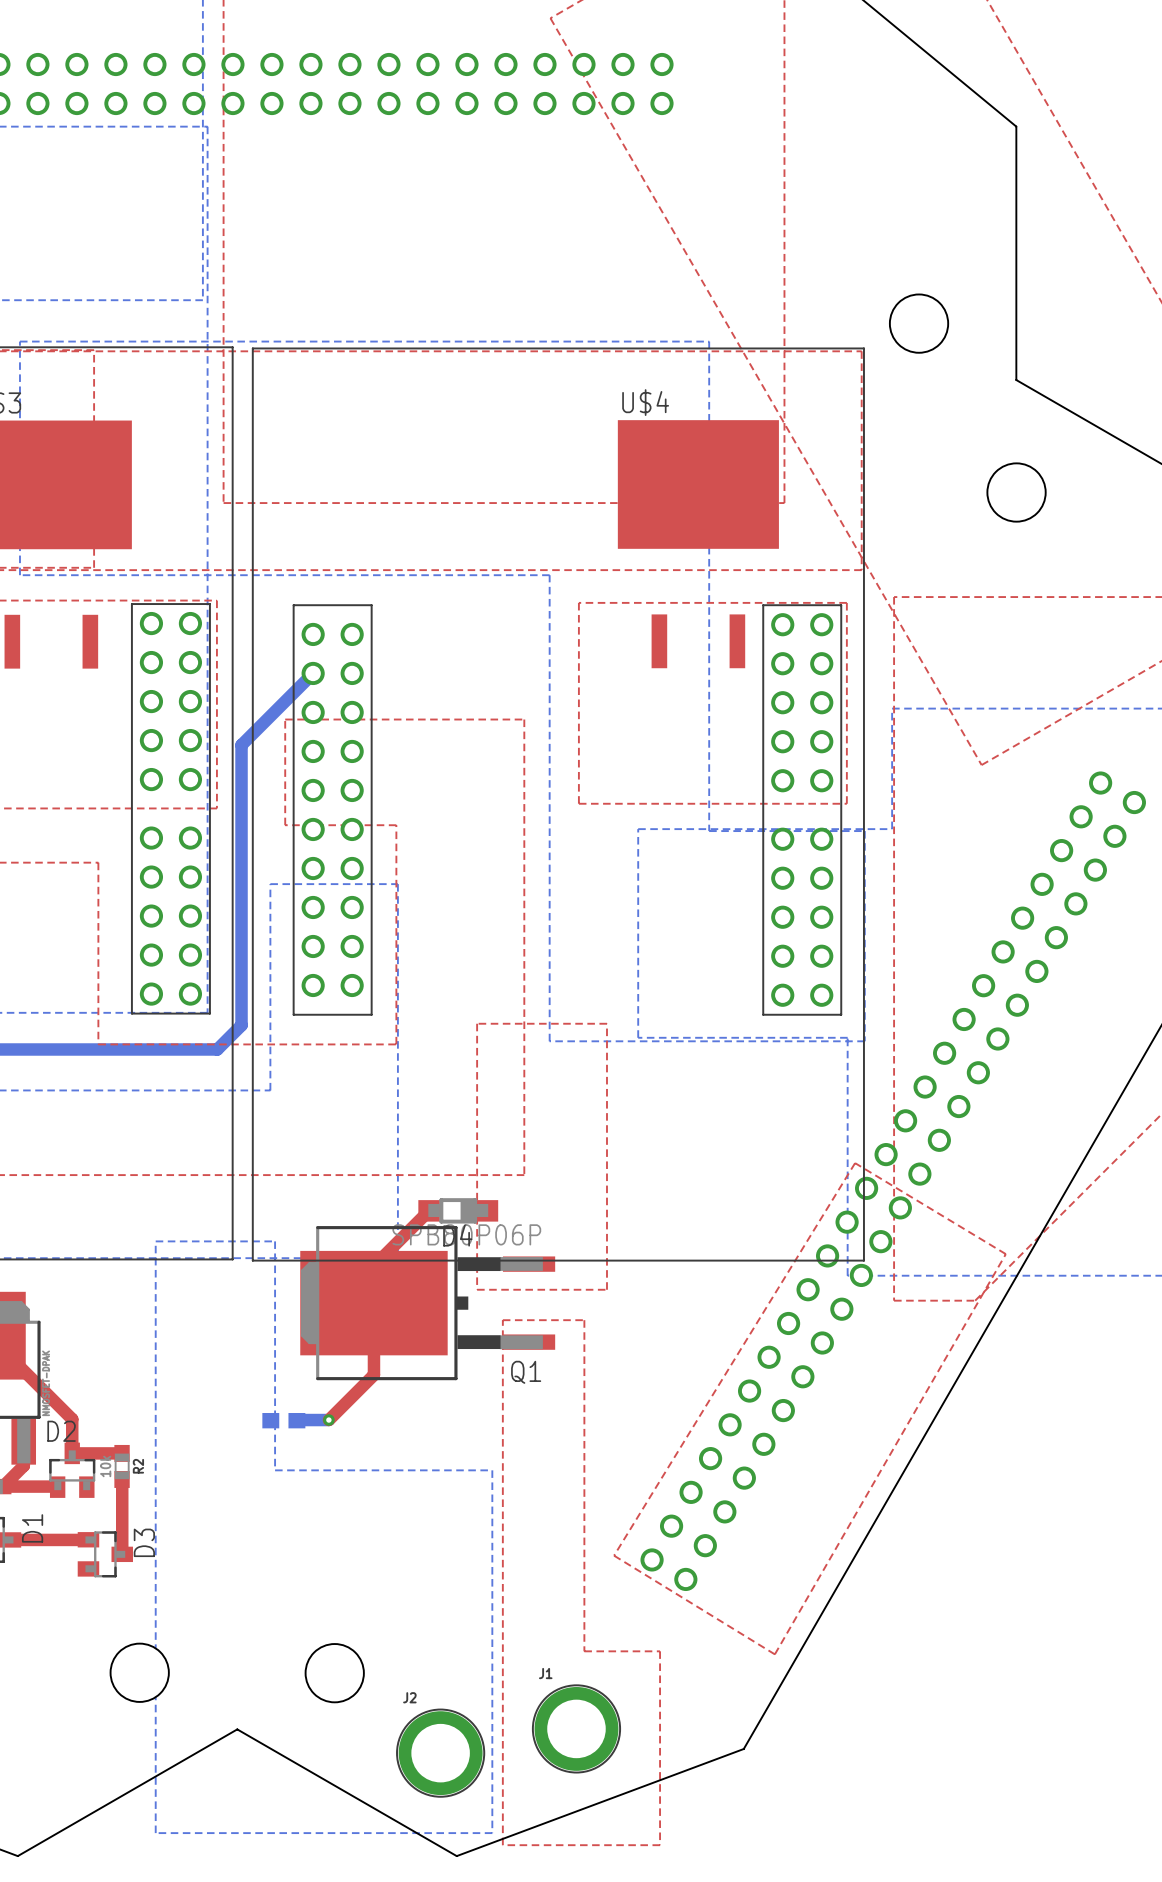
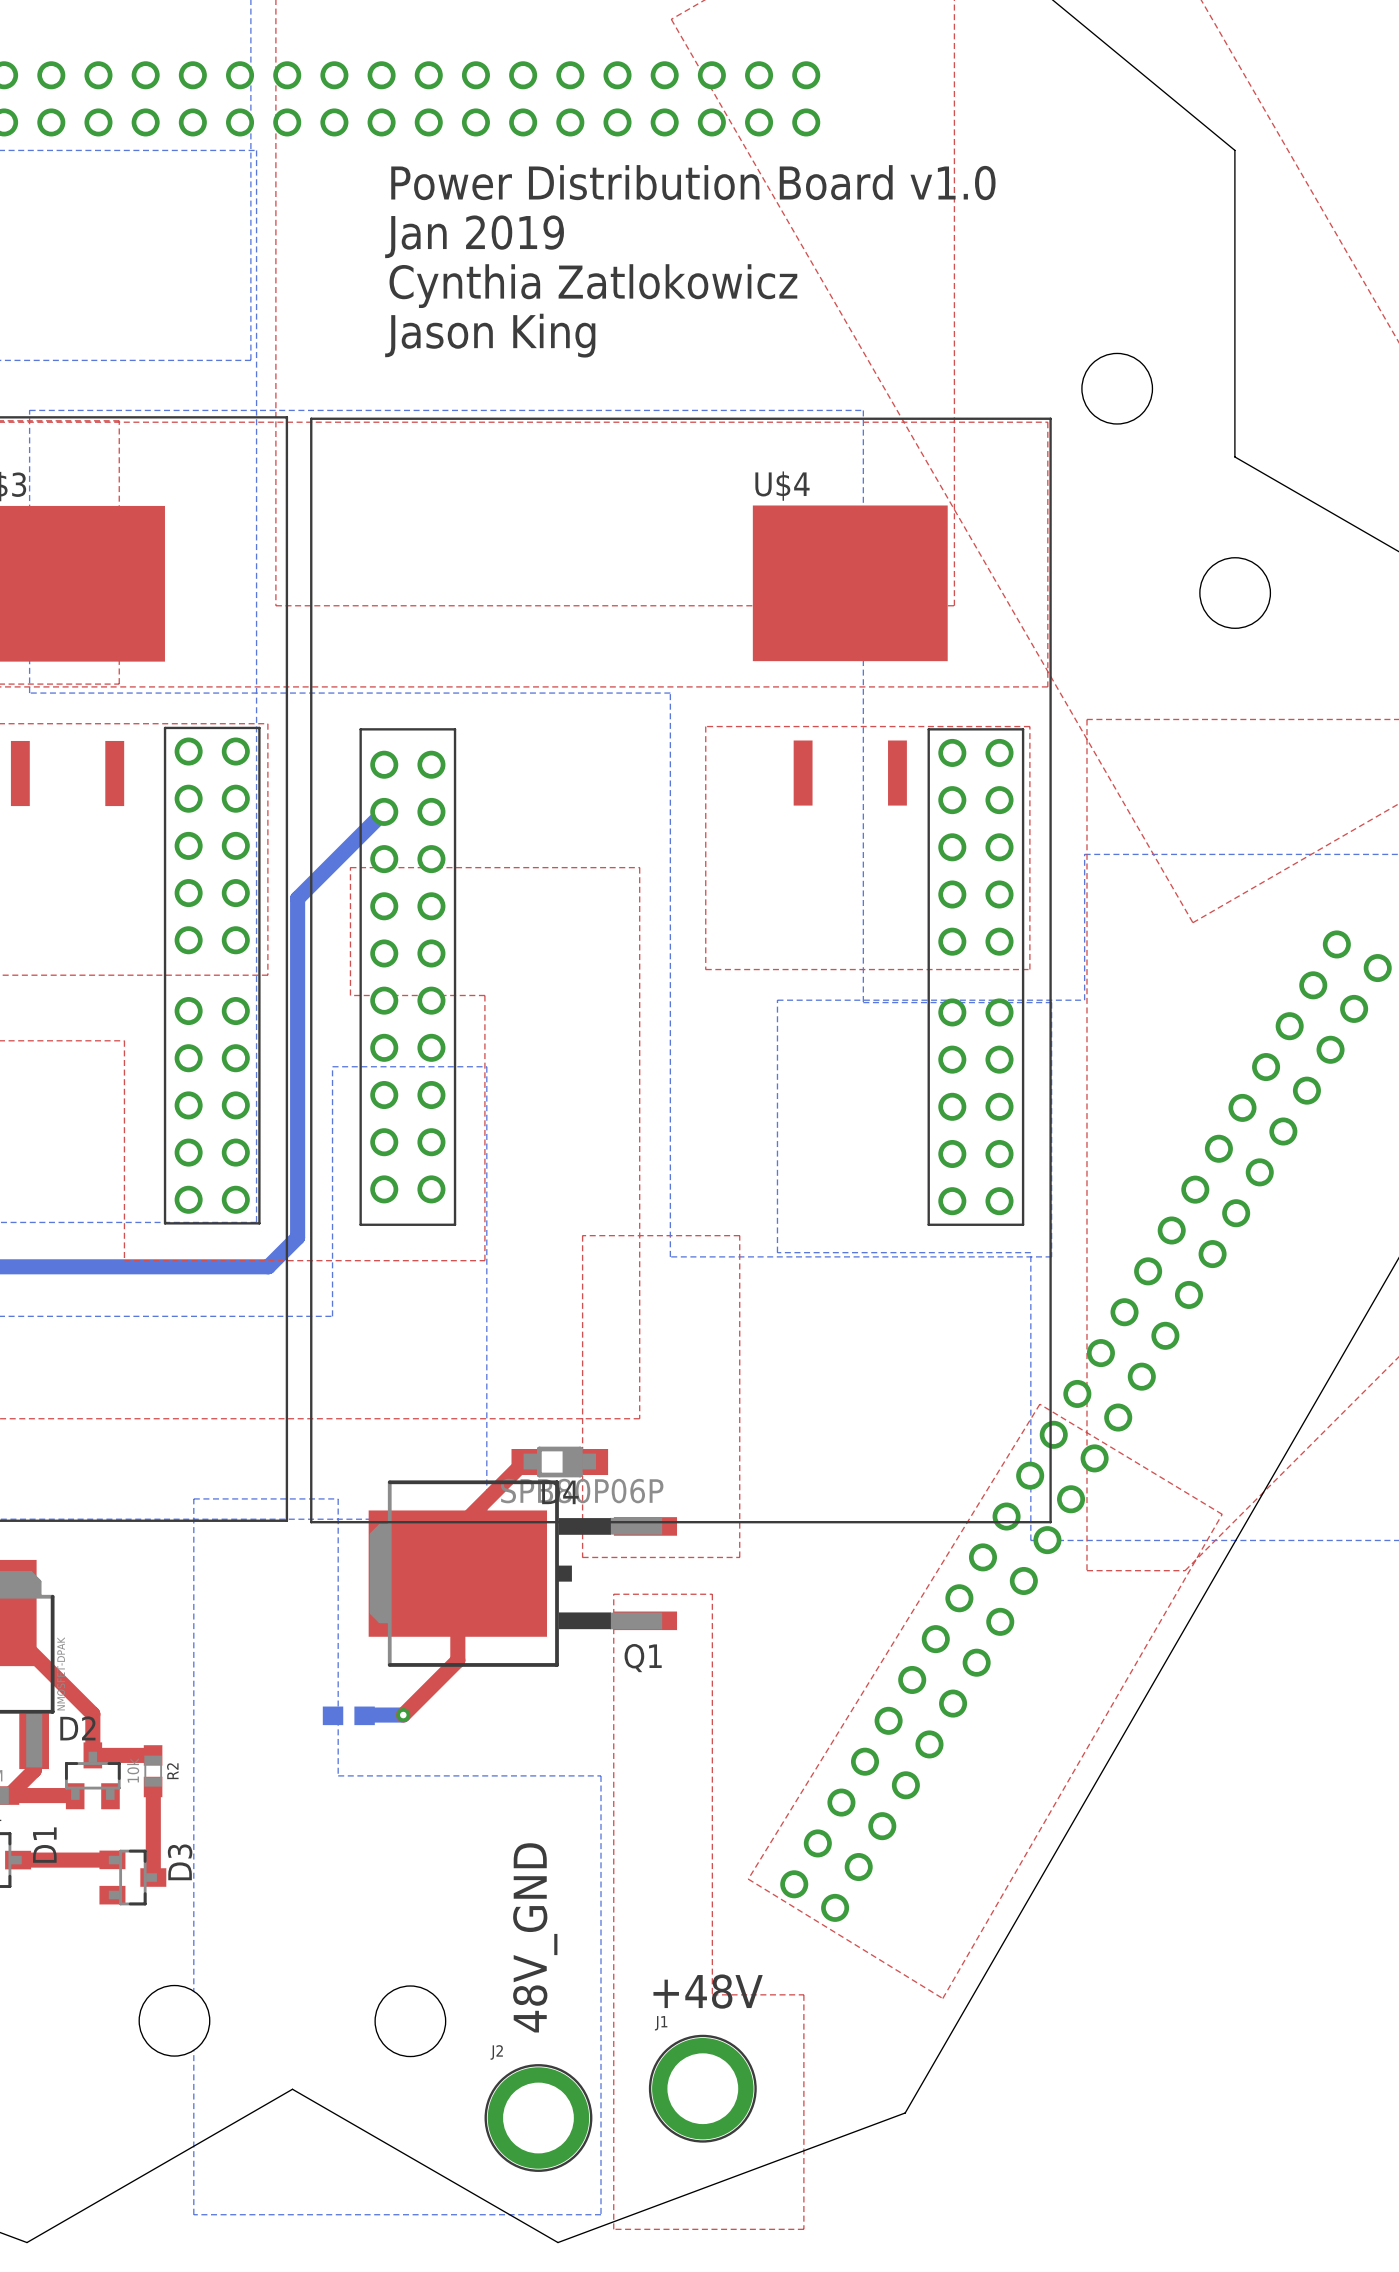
text: none -> Power Distribution Board v1.0 (693, 182)
text: none -> Jan 2019 (474, 236)
text: none -> Cynthia Zatlokowicz (593, 286)
text: none -> Jason King (490, 335)
text: none -> 48V_GND (535, 1937)
text: none -> +48V (708, 1991)

